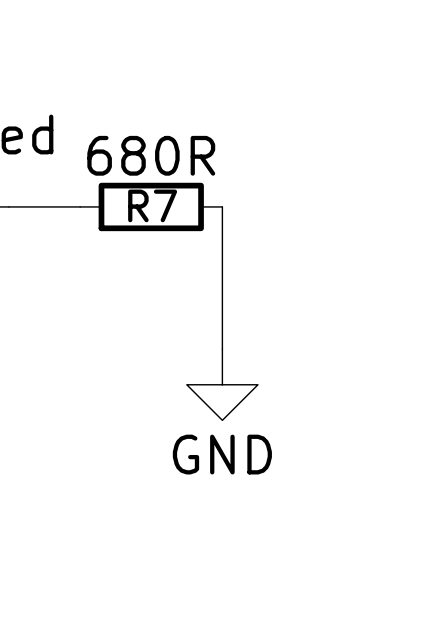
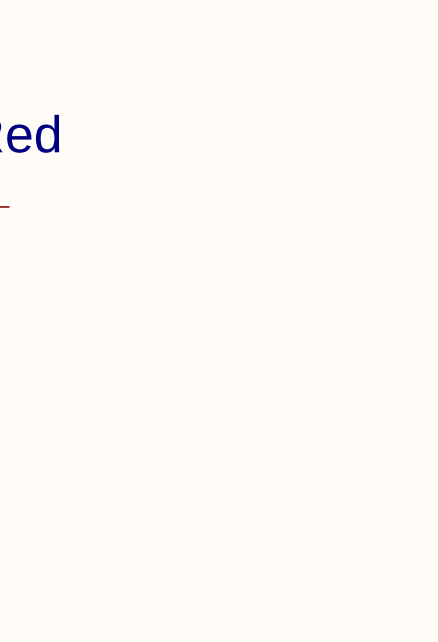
wire: (9, 206) (80, 206) -> none
R7: 680R (151, 206) -> none
wire: (222, 206) (222, 349) -> none
power symbol: GND (222, 384) -> none

